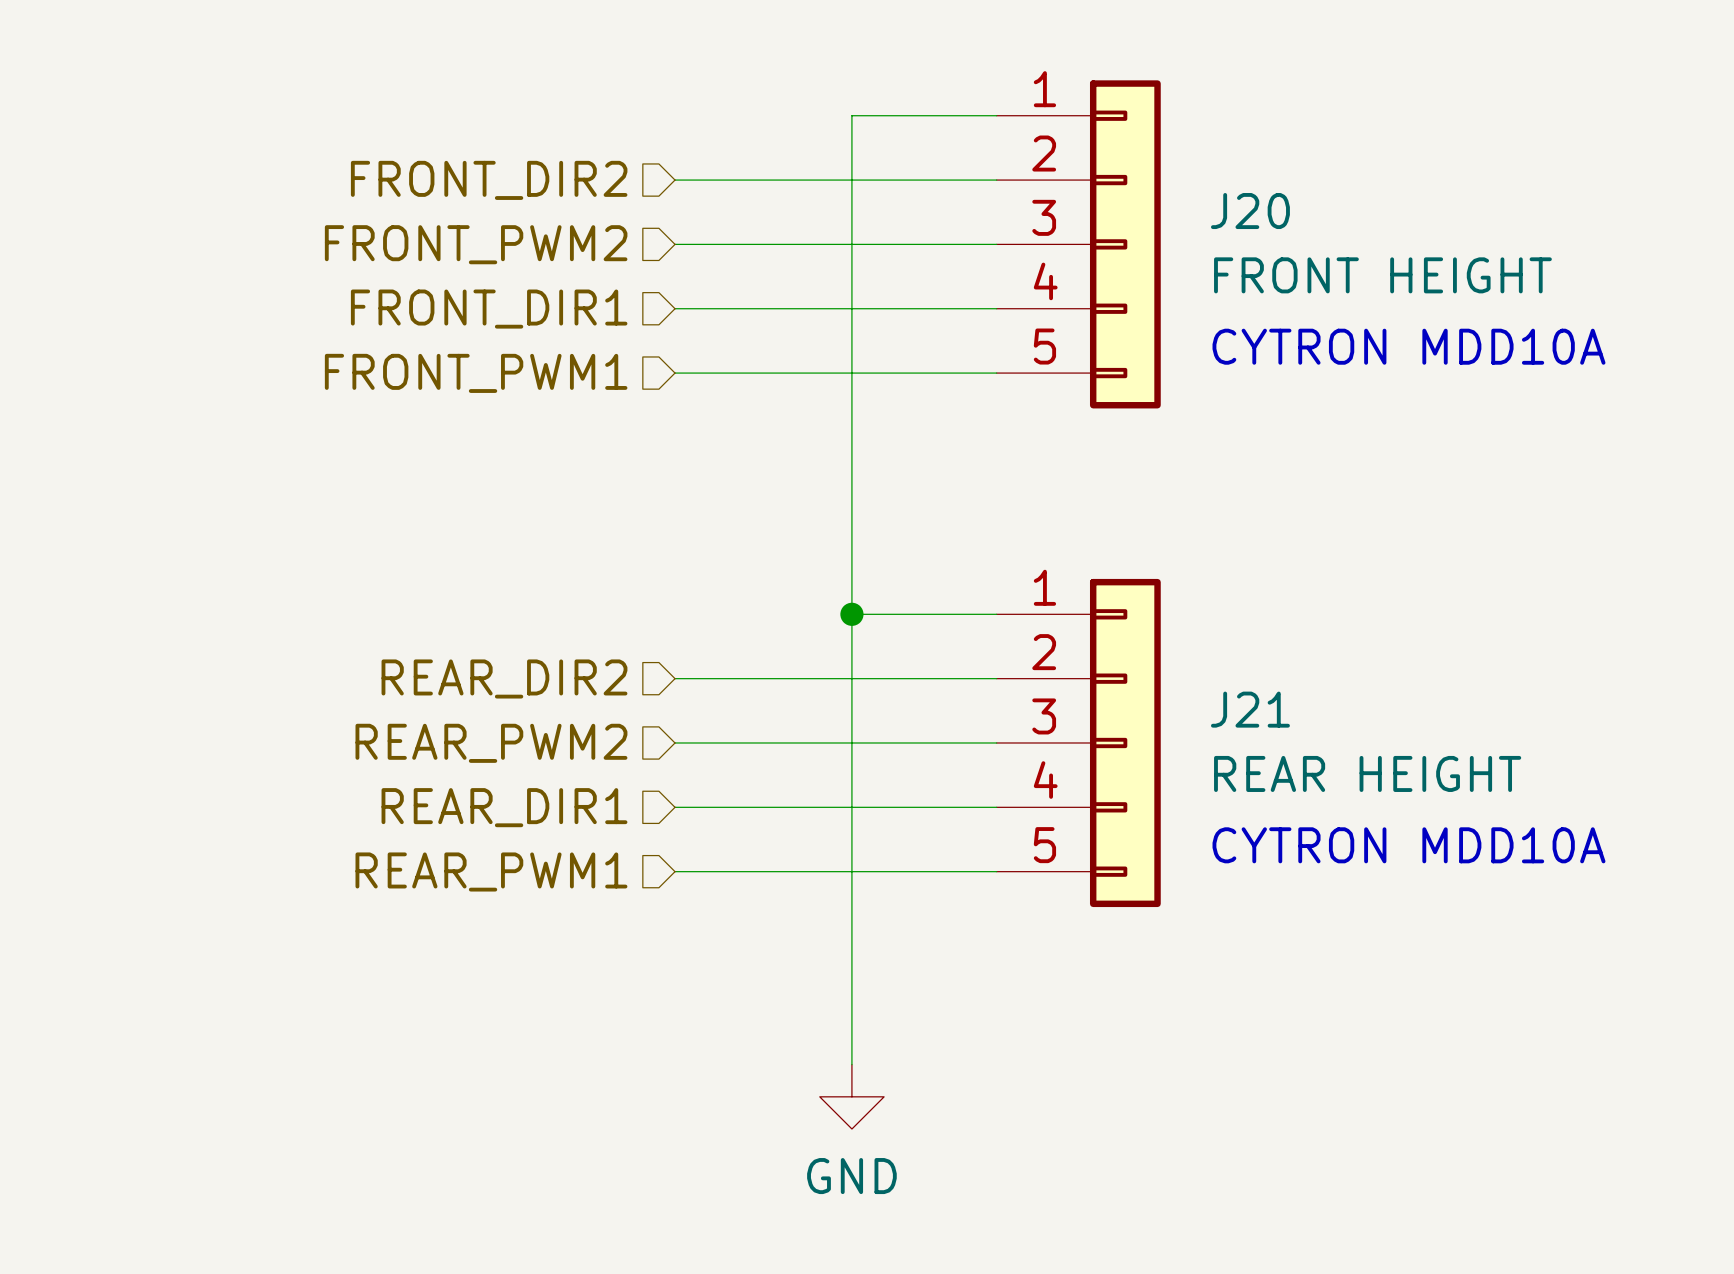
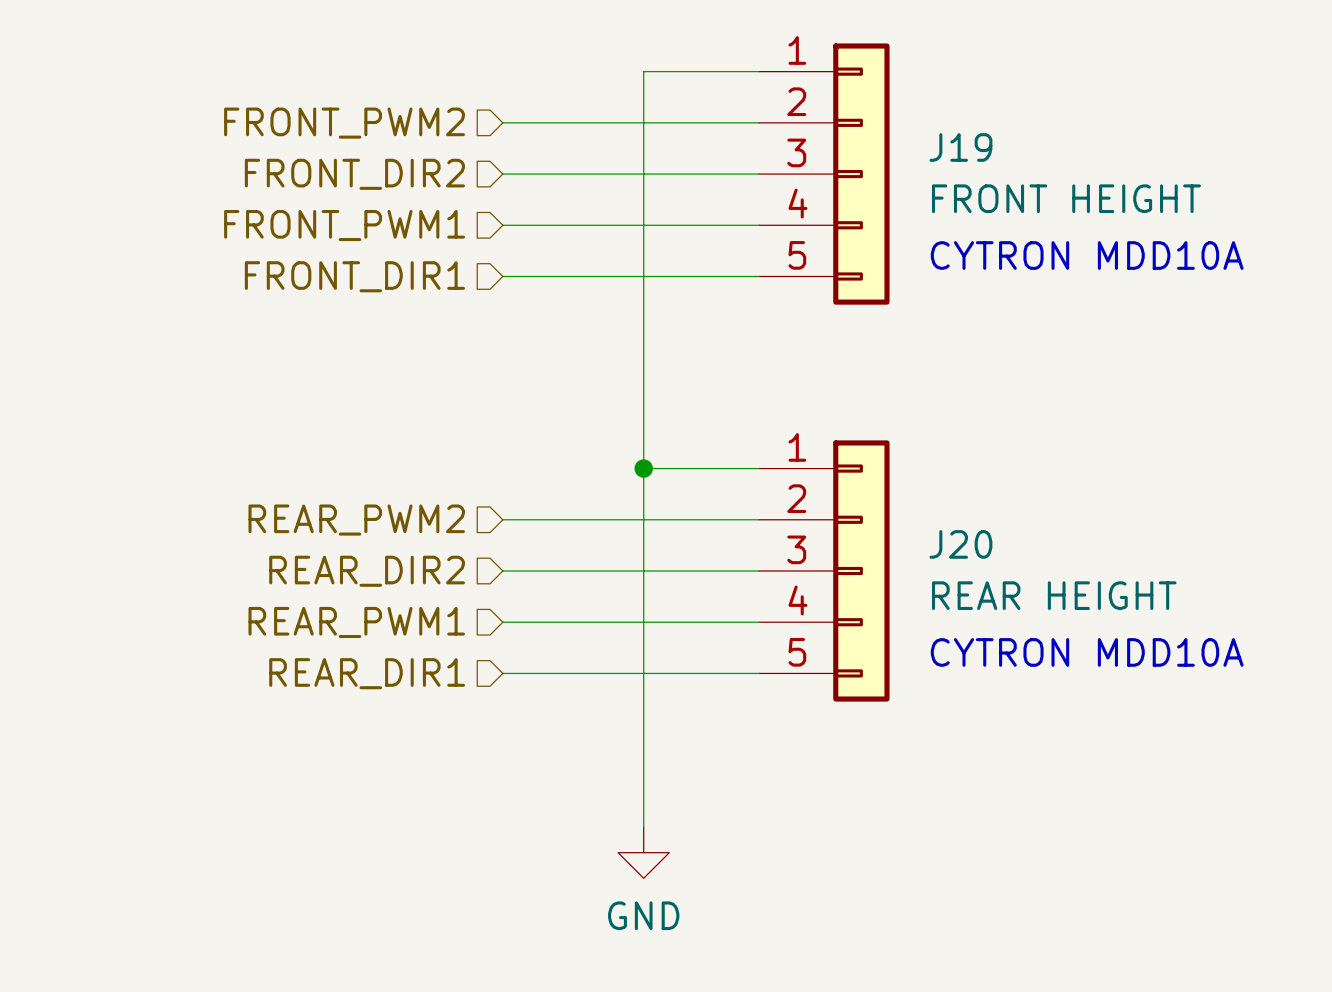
hierarchical label: FRONT_DIR2 (489, 180) -> FRONT_PWM2 (344, 123)
J20 name: J20 (1250, 211) -> J19 (960, 147)
hierarchical label: FRONT_PWM2 (476, 244) -> FRONT_DIR2 (354, 174)
hierarchical label: FRONT_DIR1 (489, 309) -> FRONT_PWM1 (344, 225)
hierarchical label: FRONT_PWM1 (476, 373) -> FRONT_DIR1 (354, 276)
hierarchical label: REAR_DIR2 (504, 678) -> REAR_PWM2 (356, 520)
J21 name: J21 (1250, 709) -> J20 (960, 544)
hierarchical label: REAR_PWM2 (491, 743) -> REAR_DIR2 (367, 571)
hierarchical label: REAR_DIR1 (504, 807) -> REAR_PWM1 (356, 622)
hierarchical label: REAR_PWM1 (491, 871) -> REAR_DIR1 (367, 673)

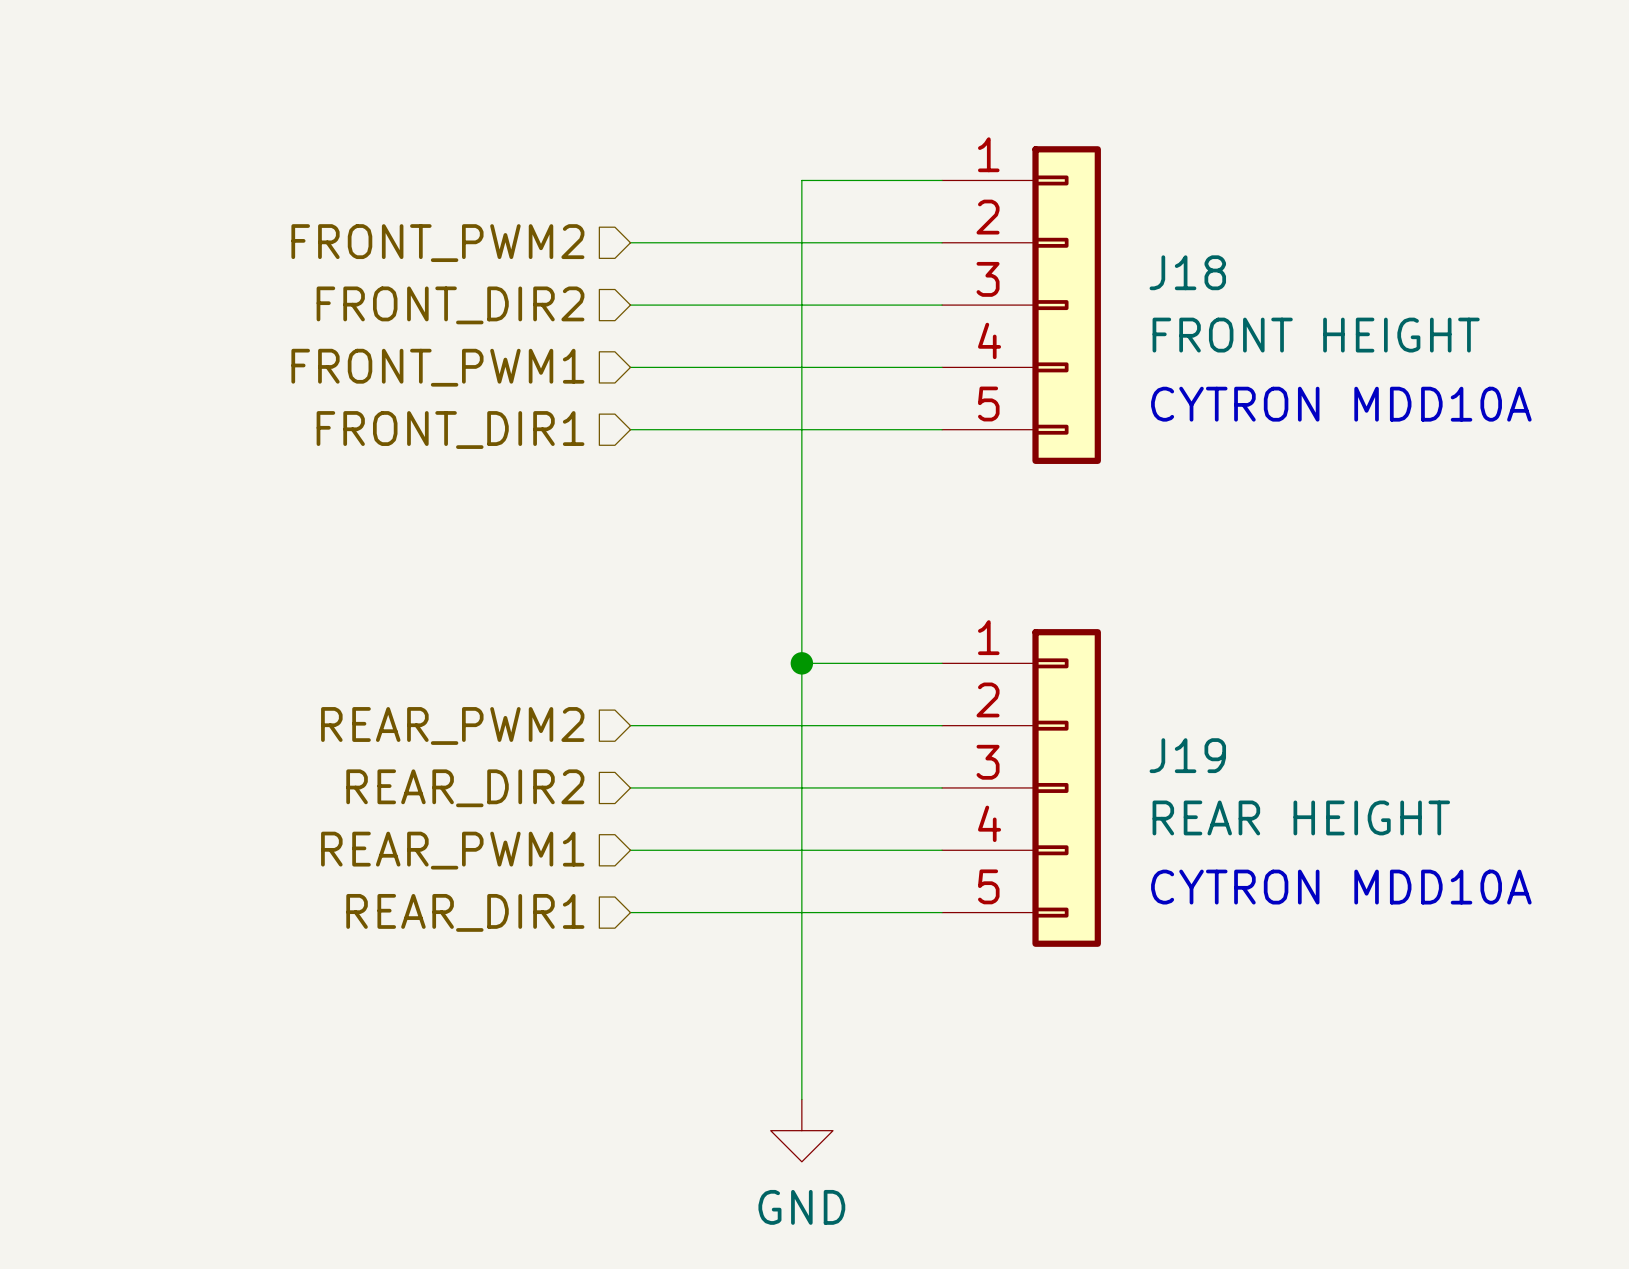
J19 name: J19 (960, 147) -> J18 (1187, 272)
J20 name: J20 (960, 544) -> J19 (1187, 755)

